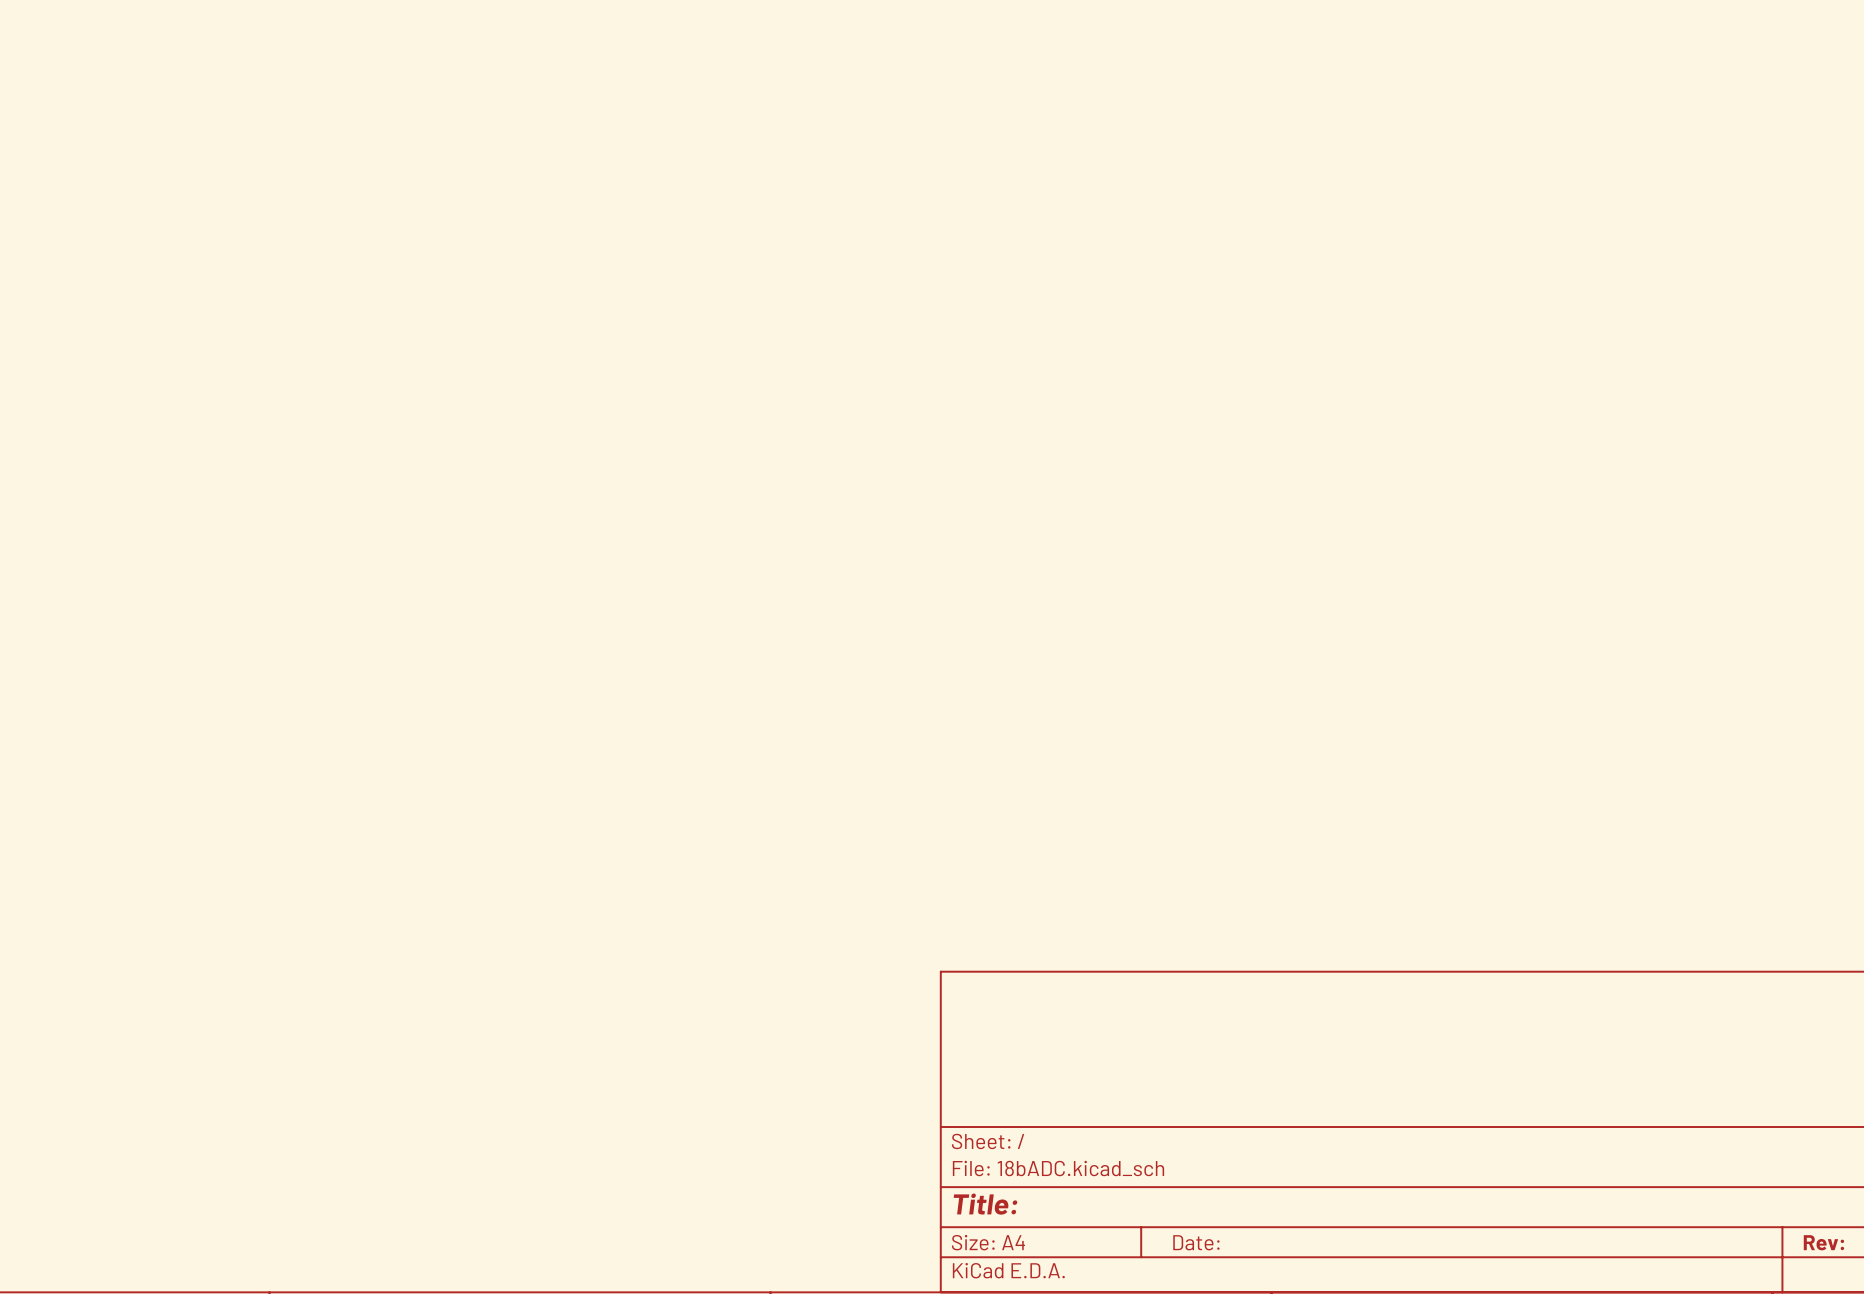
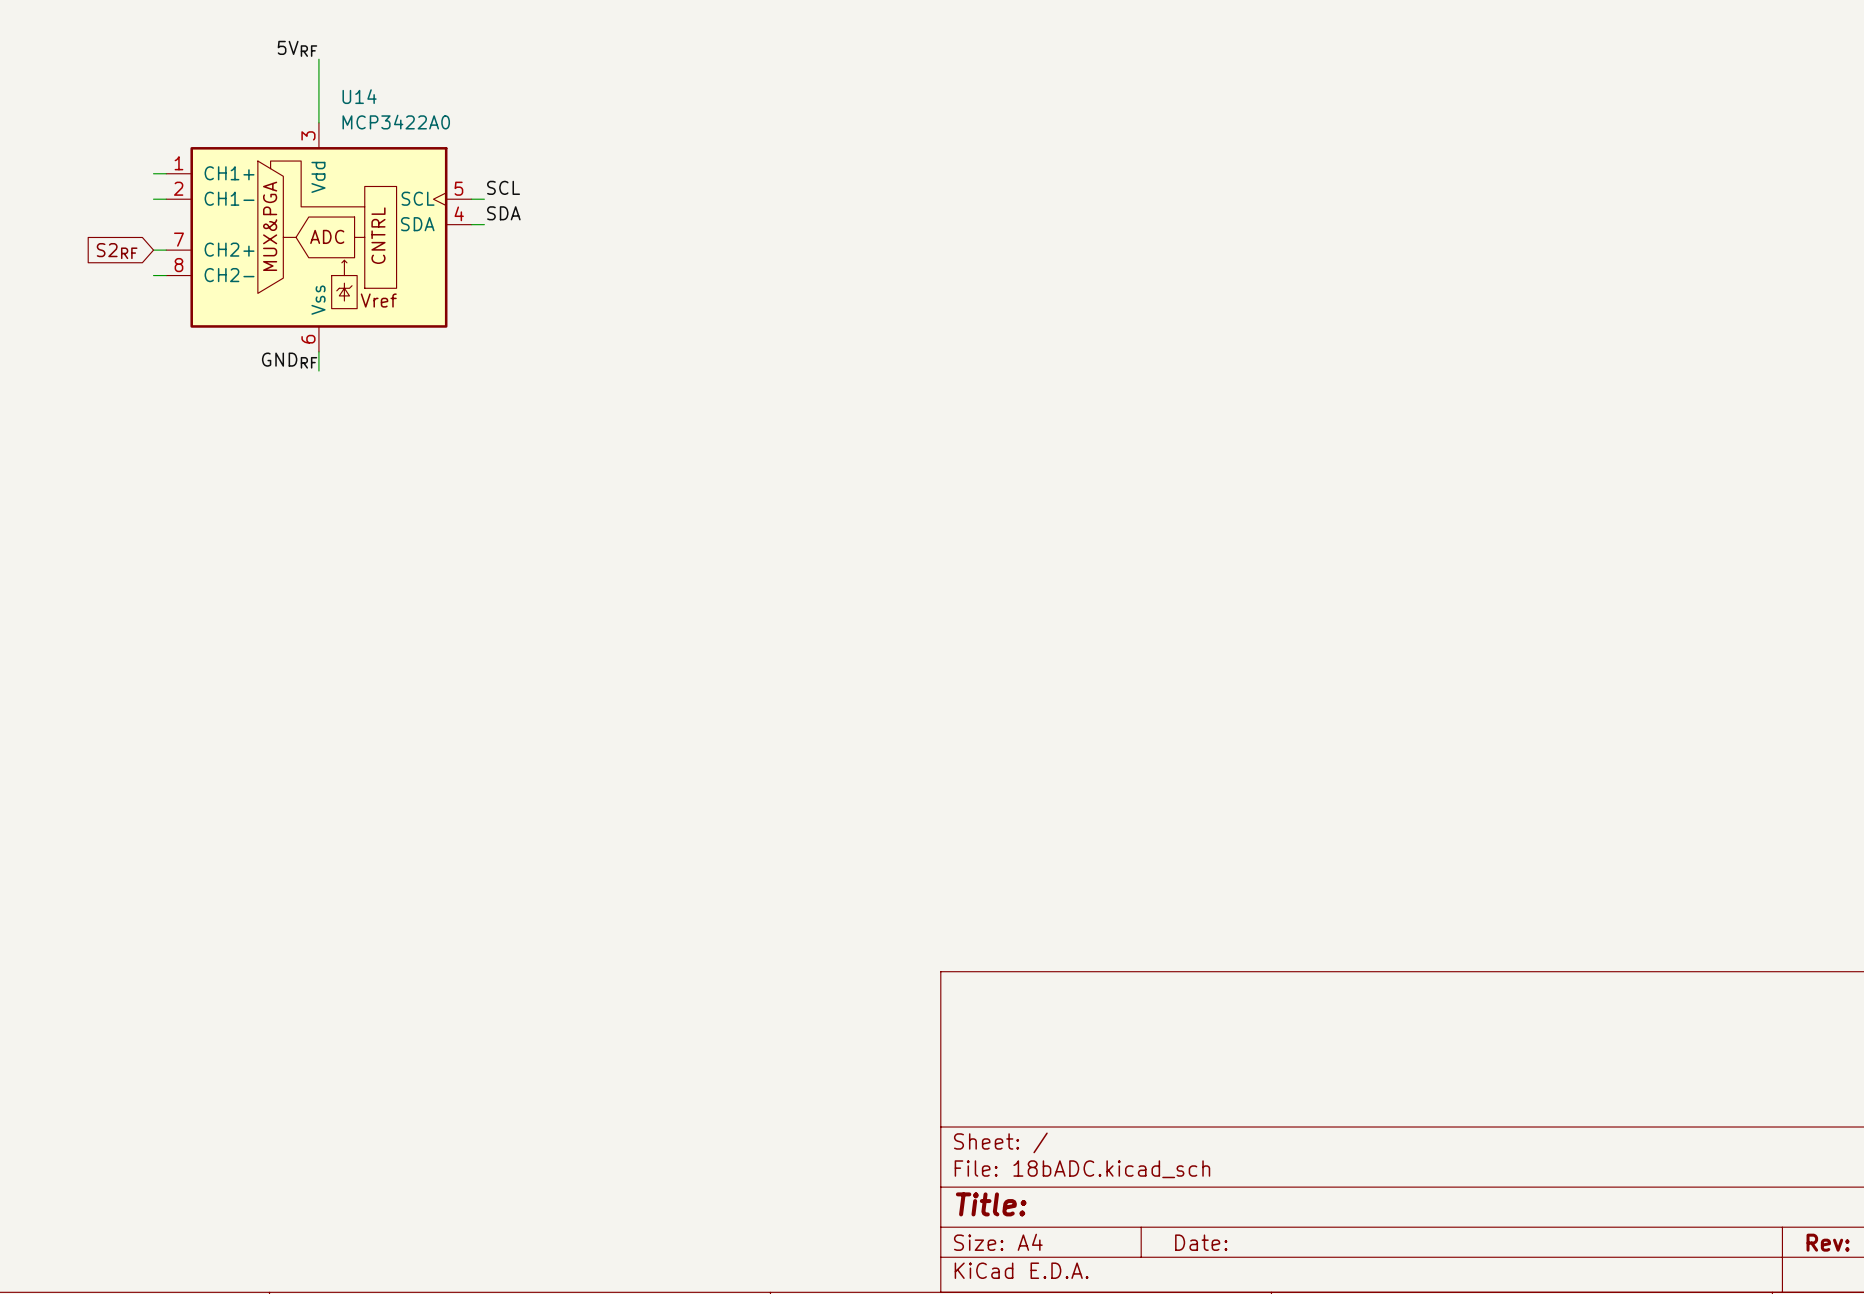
label: none -> 5VRF (297, 48)
wire: none -> (318, 59) (318, 122)
wire: none -> (153, 173) (166, 173)
label: none -> SCL (503, 187)
wire: none -> (153, 199) (166, 199)
wire: none -> (471, 199) (484, 199)
label: none -> SDA (503, 213)
wire: none -> (471, 224) (484, 224)
U14: none -> MCP3422A0 (318, 237)
global label: none -> S2RF (117, 251)
wire: none -> (153, 250) (166, 250)
wire: none -> (153, 275) (166, 275)
wire: none -> (318, 351) (318, 370)
label: none -> GNDRF (289, 360)

